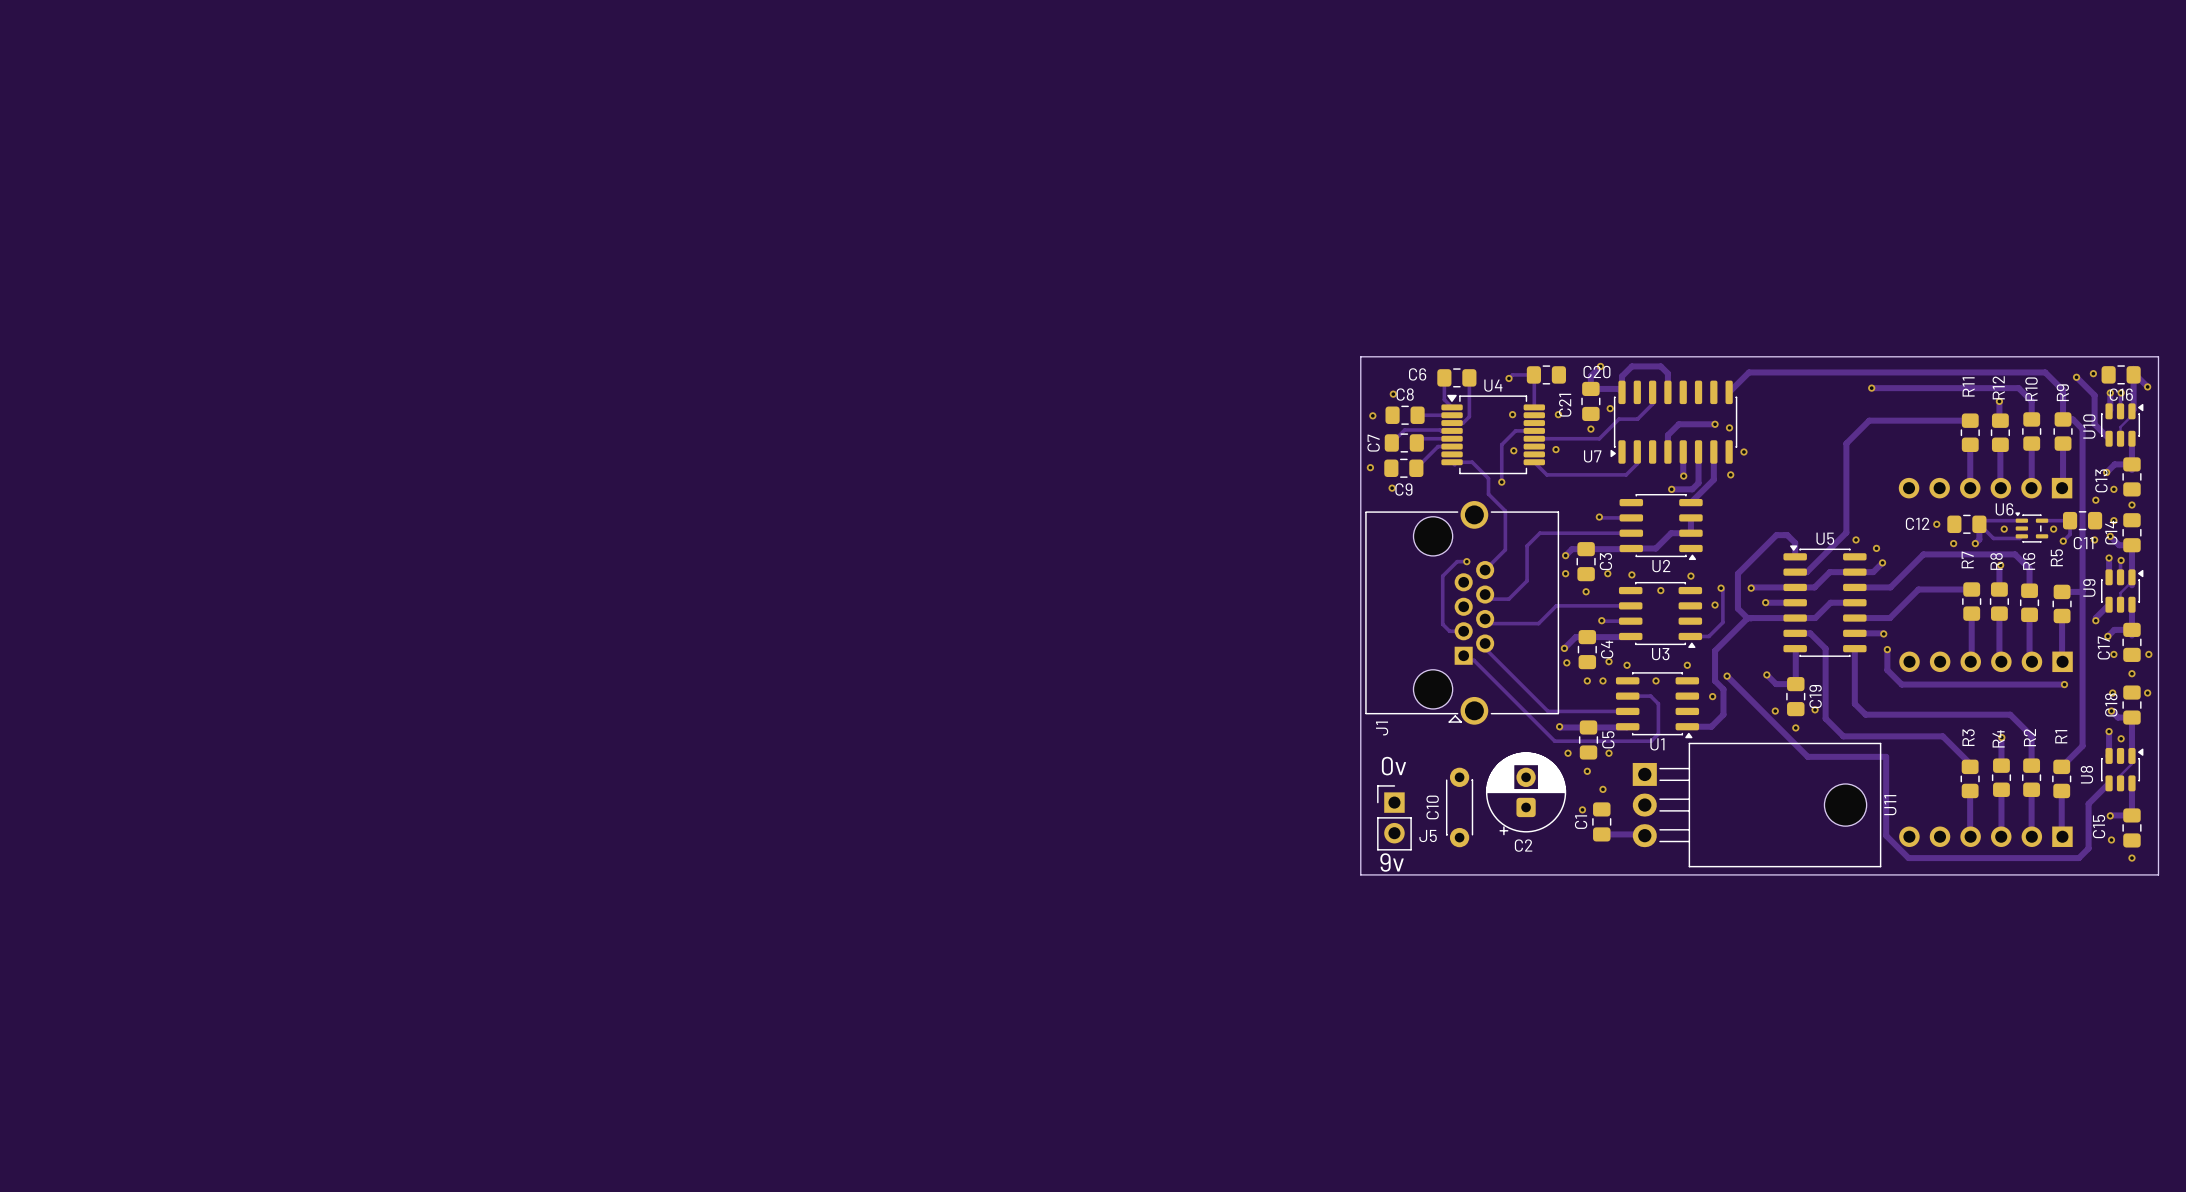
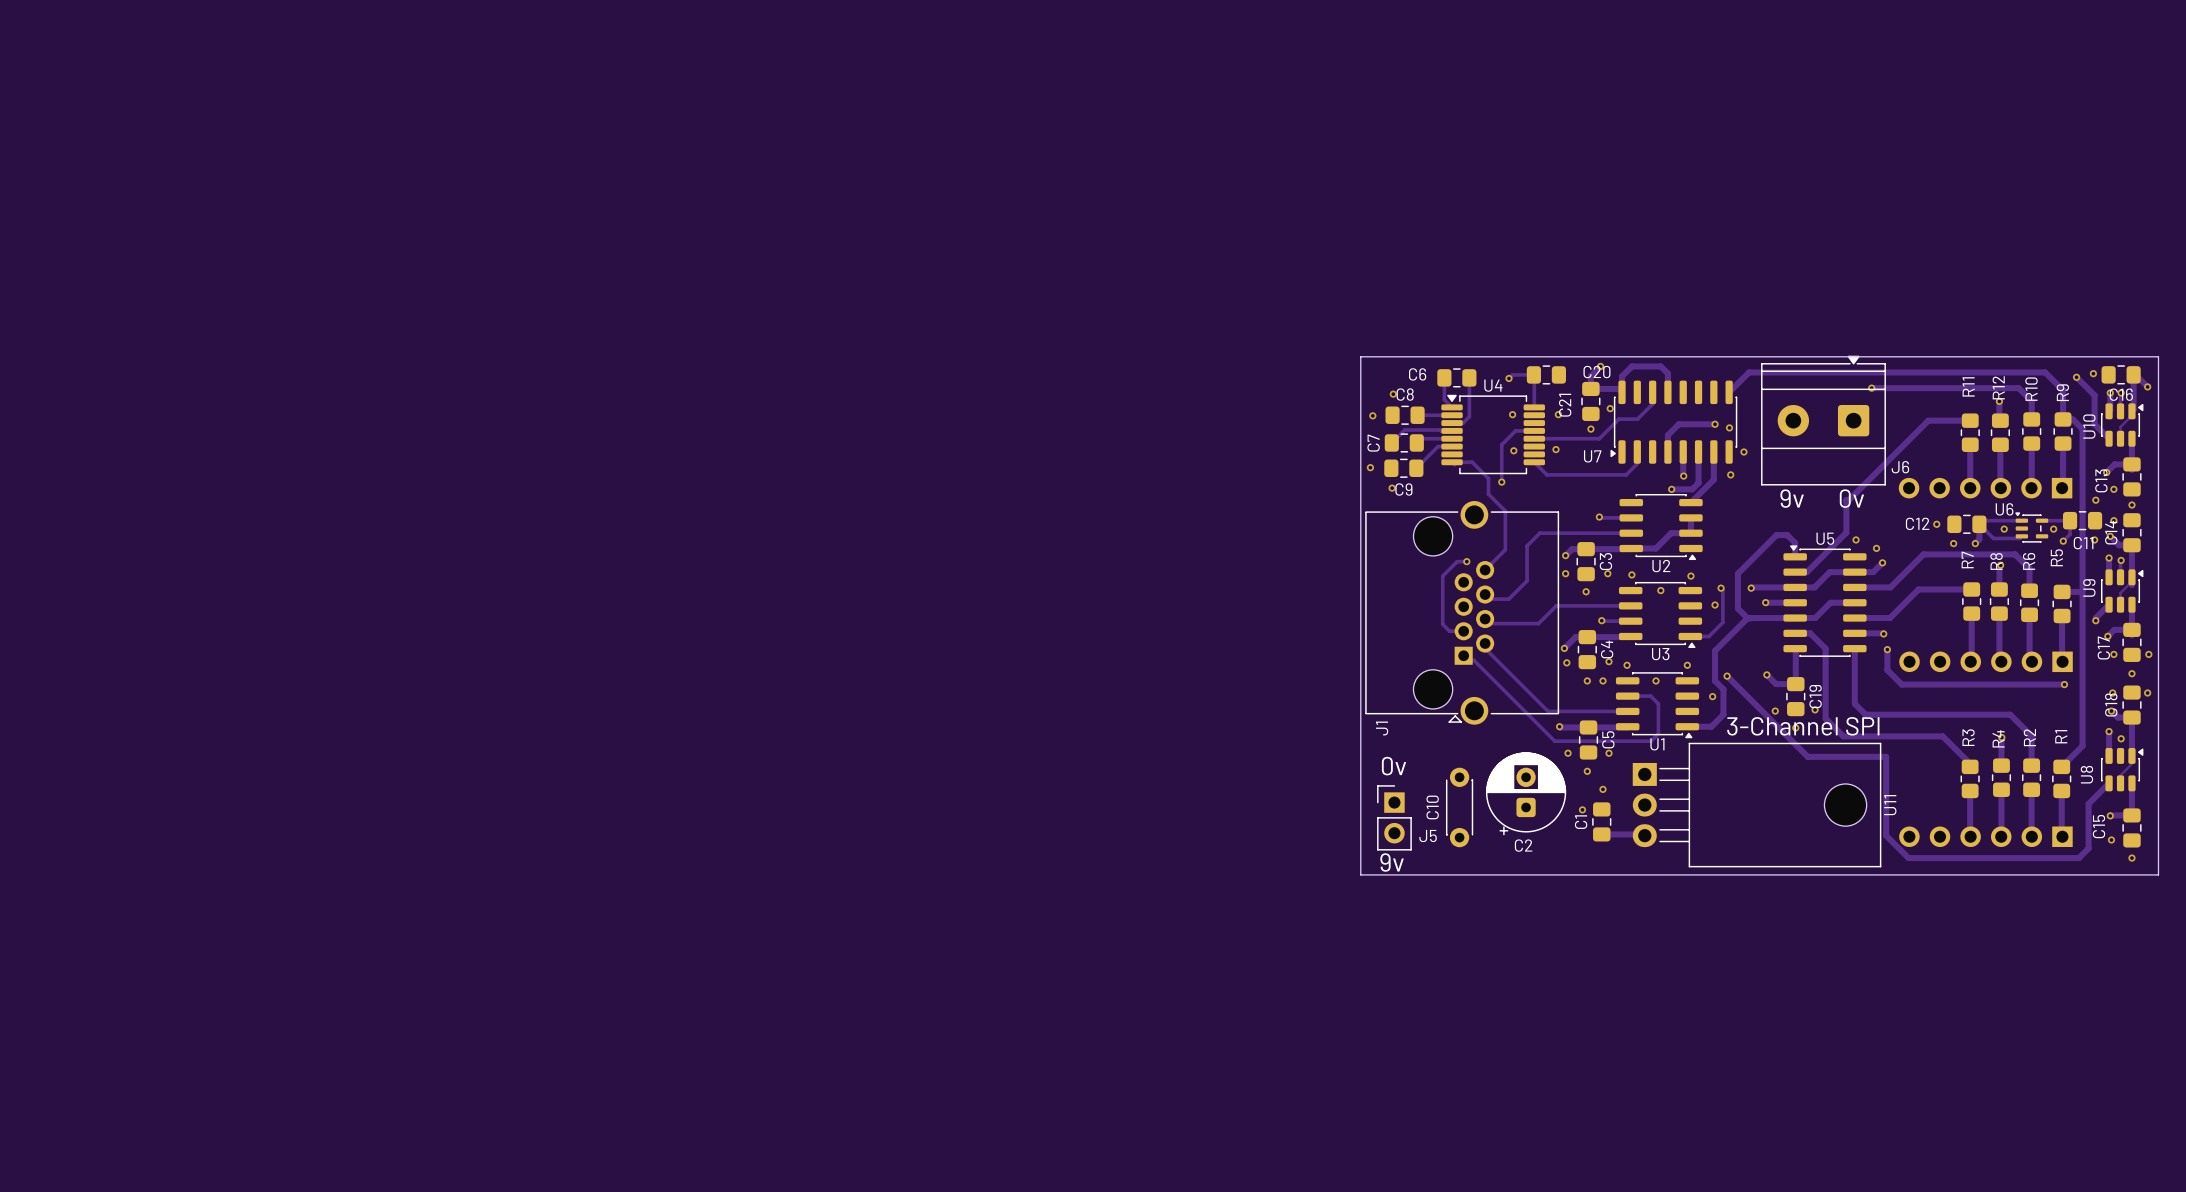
J6: none -> (1823, 420)
track: (1928, 420) (1869, 420) (1846, 443) (1846, 500) -> (1928, 420) (1848, 500) (1846, 500)
text: none -> 9v (1792, 498)
text: none -> 0v (1851, 498)
text: none -> 3-Channel SPI (1803, 726)

